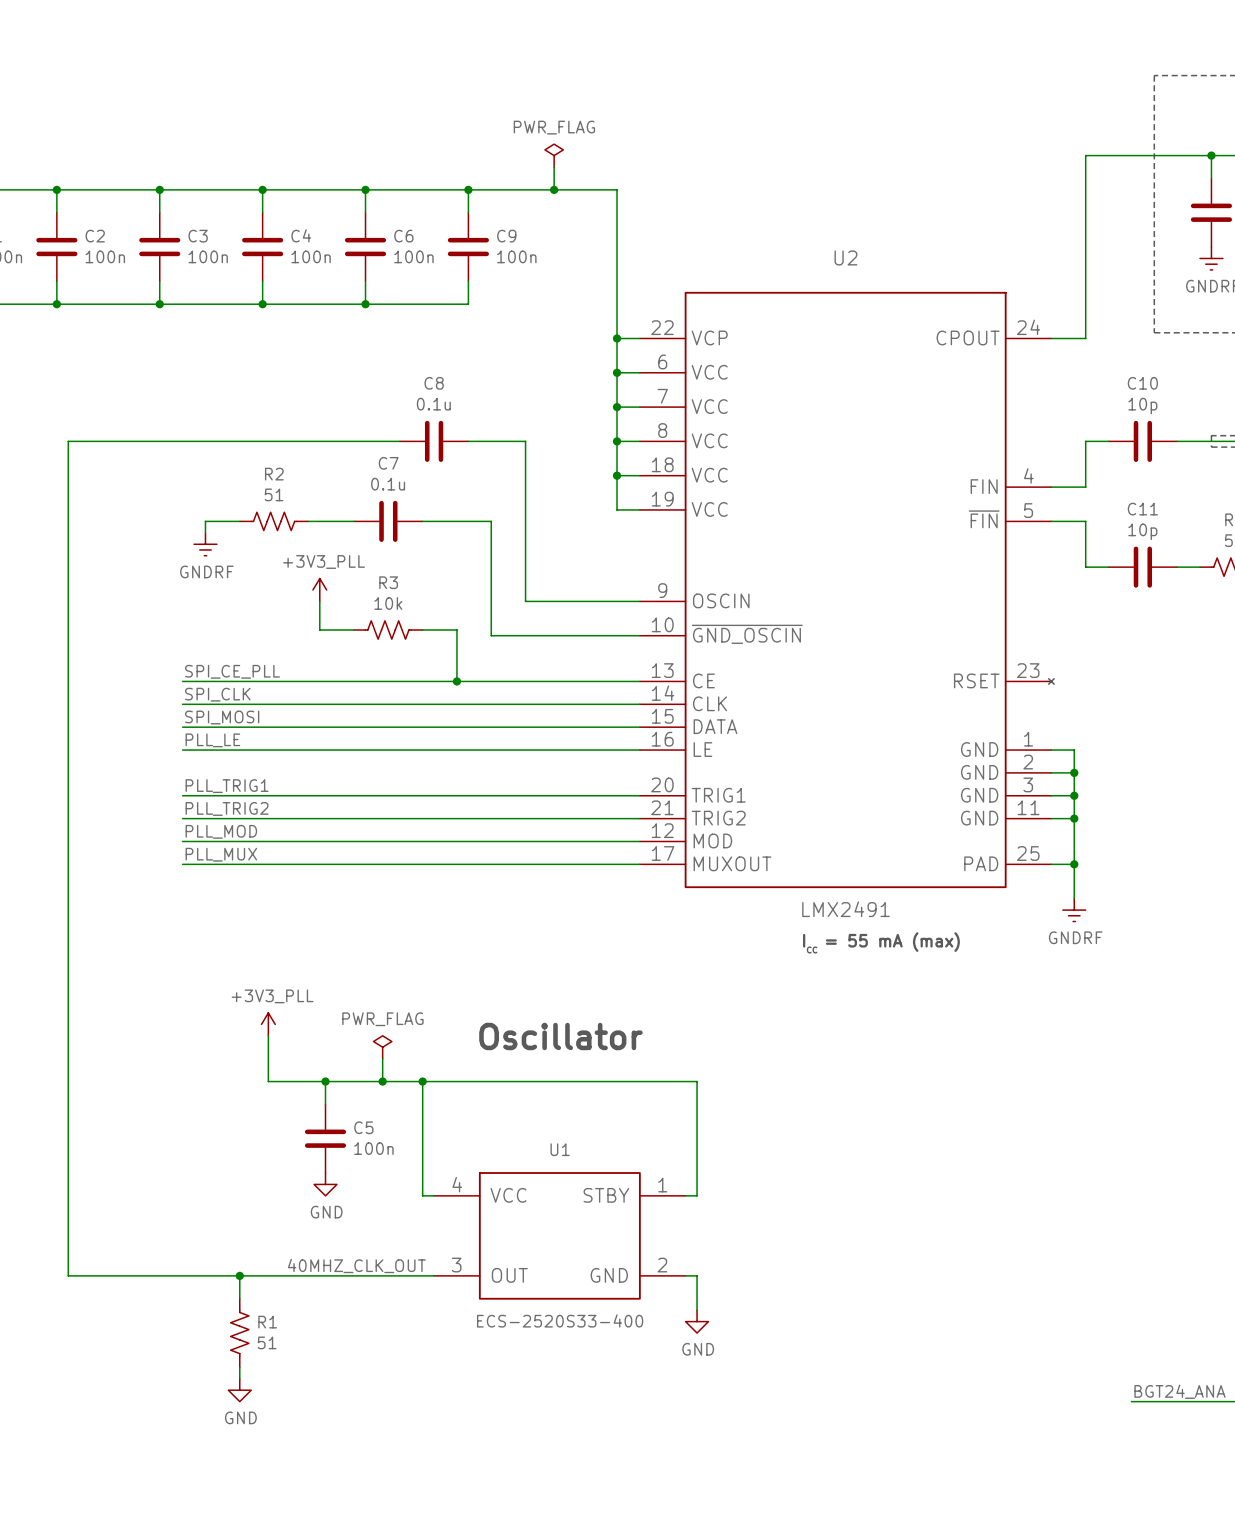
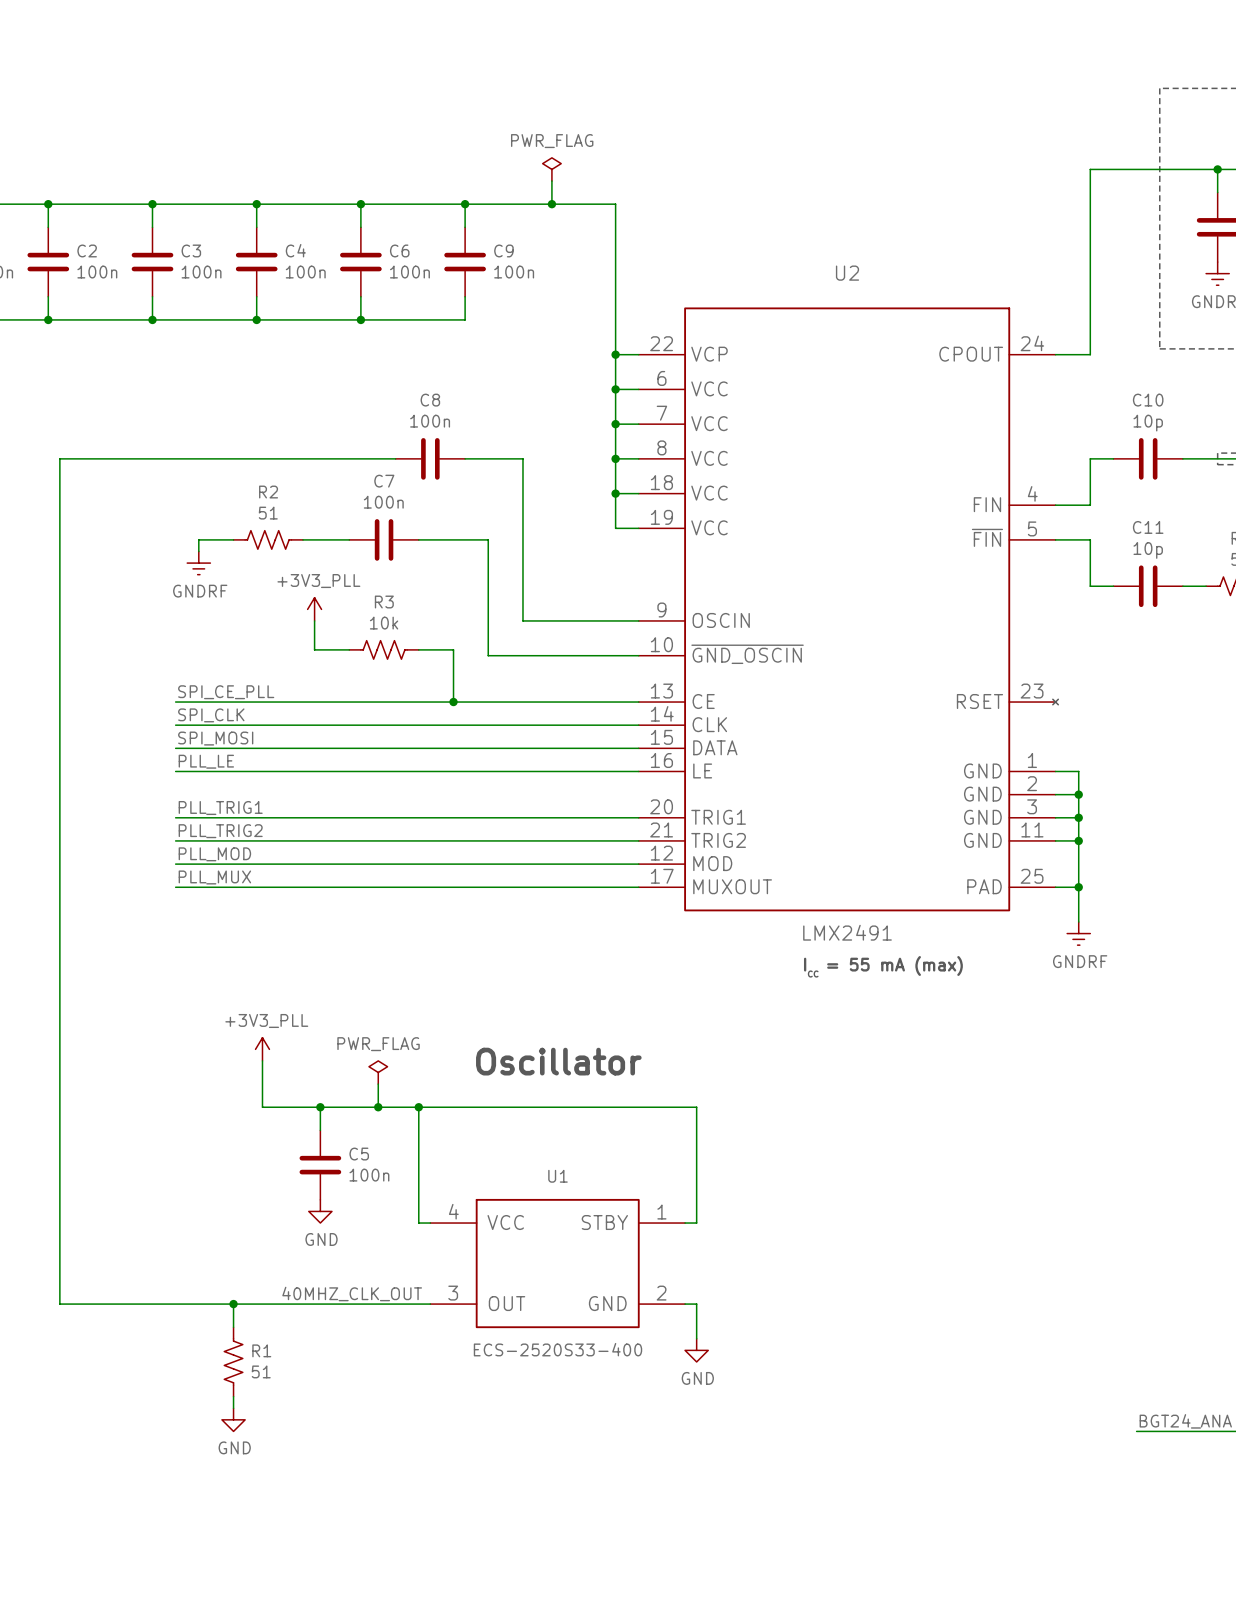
C8 value: 0.1u (433, 404) -> 100n (430, 421)
C7 value: 0.1u (388, 484) -> 100n (383, 502)

